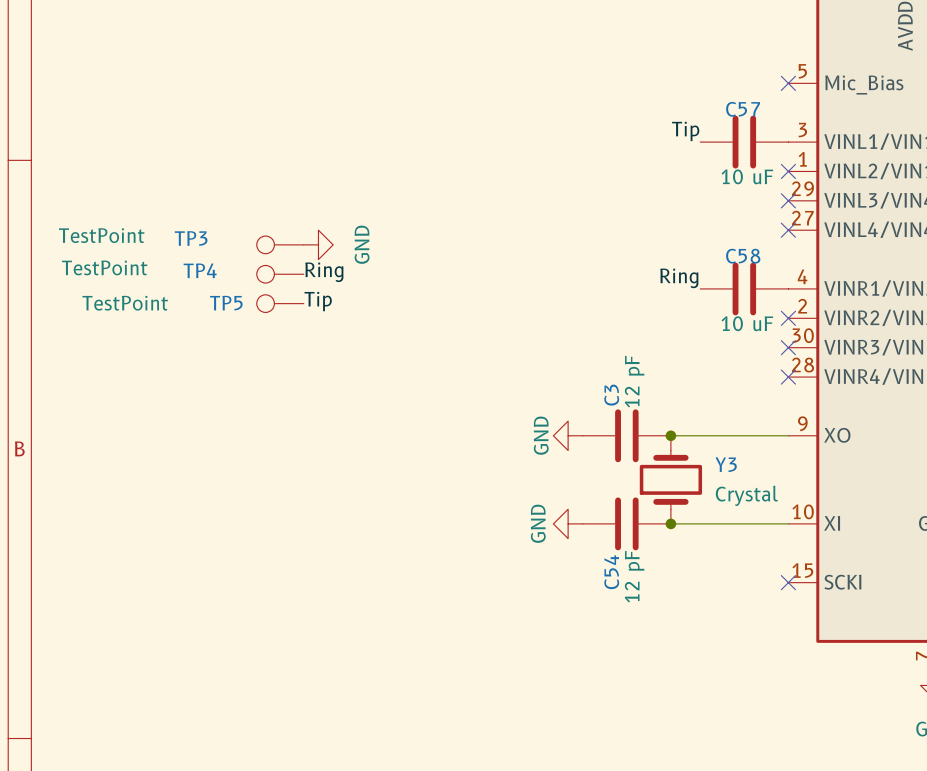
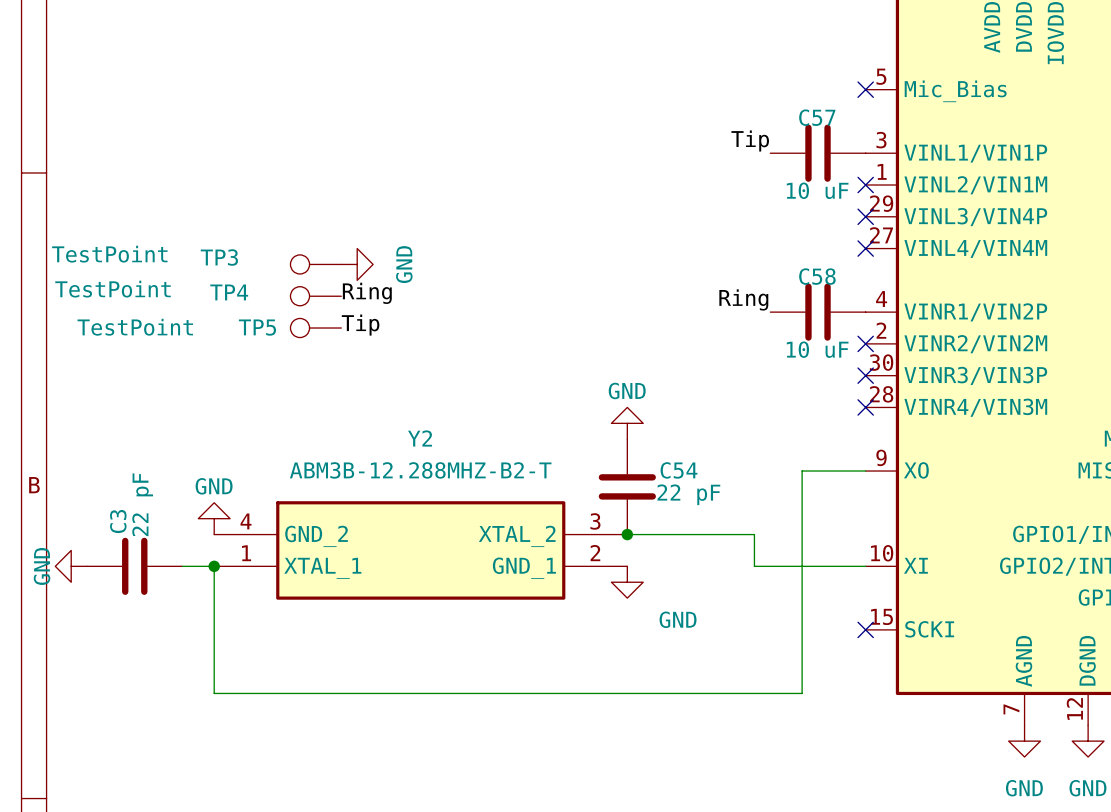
C3 value: 12 pF (634, 381) -> 22 pF (142, 504)
power symbol rotation: 0° (568, 435) -> 90° clockwise (627, 423)
power symbol position: GND (568, 435) -> GND (627, 423)
C3 position: (626, 435) -> (134, 566)
wire: (670, 435) (729, 435) -> (182, 566) (214, 566) (214, 693) (802, 693) (802, 471)
junction: (670, 435) -> none
power symbol: none -> GND (214, 518)
Y3: Crystal (670, 479) -> none
junction: none -> (627, 534)
Y2: none -> ABM3B-12.288MHZ-B2-T (420, 550)
power symbol: none -> GND (71, 566)
junction: none -> (214, 566)
power symbol text position: GND (538, 523) -> GND (678, 619)
power symbol rotation: 0° (568, 523) -> 90° counterclockwise (627, 582)
C54 rotation: 0° (626, 523) -> 90° clockwise (627, 486)
C54 position: (626, 523) -> (627, 486)
wire: (670, 523) (685, 523) -> (627, 534) (754, 534) (754, 566)
junction: (670, 523) -> none
C54 name position: C54 (611, 572) -> C54 (679, 470)
C54 value: 12 pF (634, 576) -> 22 pF (688, 494)

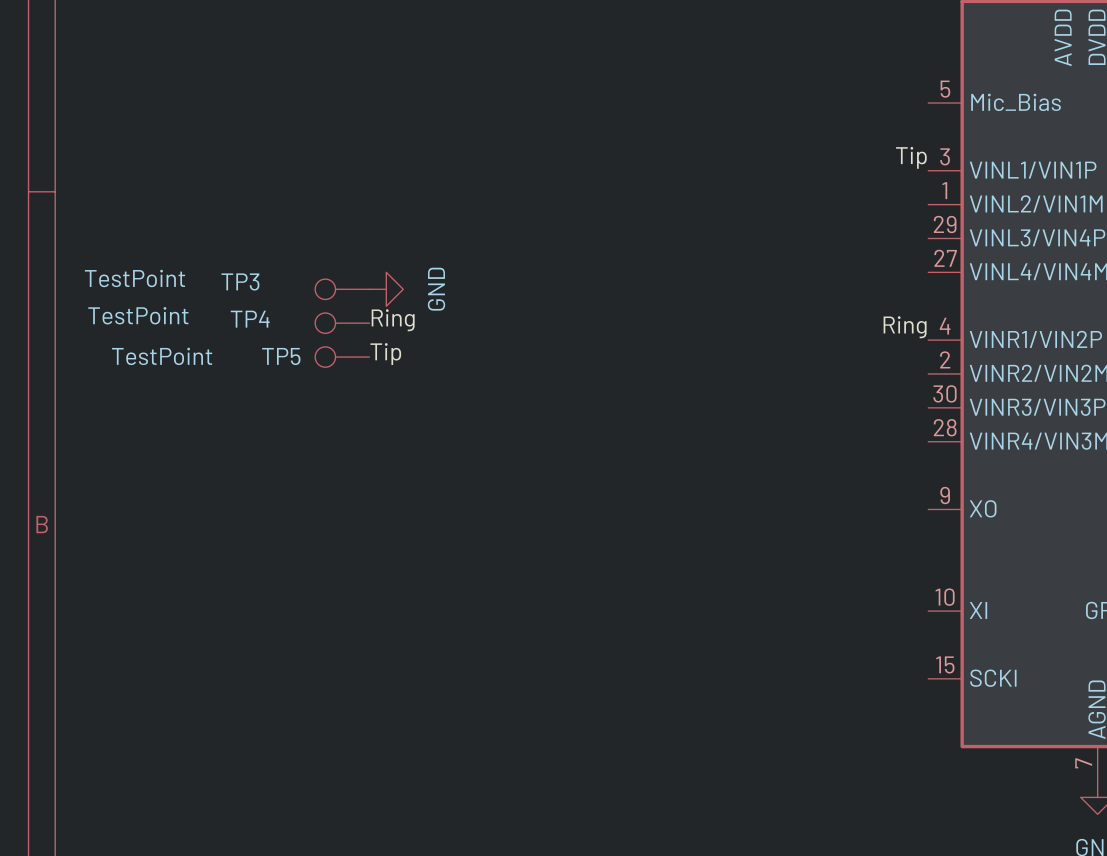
no-connect mark: (865, 89) -> none
label position: Tip (750, 140) -> Tip (911, 157)
C57: 10 uF (817, 153) -> none
no-connect mark: (865, 185) -> none
no-connect mark: (865, 216) -> none
no-connect mark: (865, 248) -> none
label position: Ring (743, 299) -> Ring (905, 327)
C58: 10 uF (817, 312) -> none
no-connect mark: (865, 343) -> none
no-connect mark: (865, 375) -> none
no-connect mark: (865, 407) -> none
power symbol: GND (627, 423) -> none
wire: (865, 471) (802, 471) (802, 693) (214, 693) (214, 566) (182, 566) -> none
C54: 22 pF (627, 486) -> none
power symbol: GND (214, 518) -> none
wire: (627, 534) (754, 534) (754, 566) (865, 566) -> none
junction: (627, 534) -> none
Y2: ABM3B-12.288MHZ-B2-T (420, 550) -> none
power symbol: GND (71, 566) -> none
C3: 22 pF (134, 566) -> none
junction: (214, 566) -> none
power symbol: GND (627, 582) -> none
no-connect mark: (865, 629) -> none

